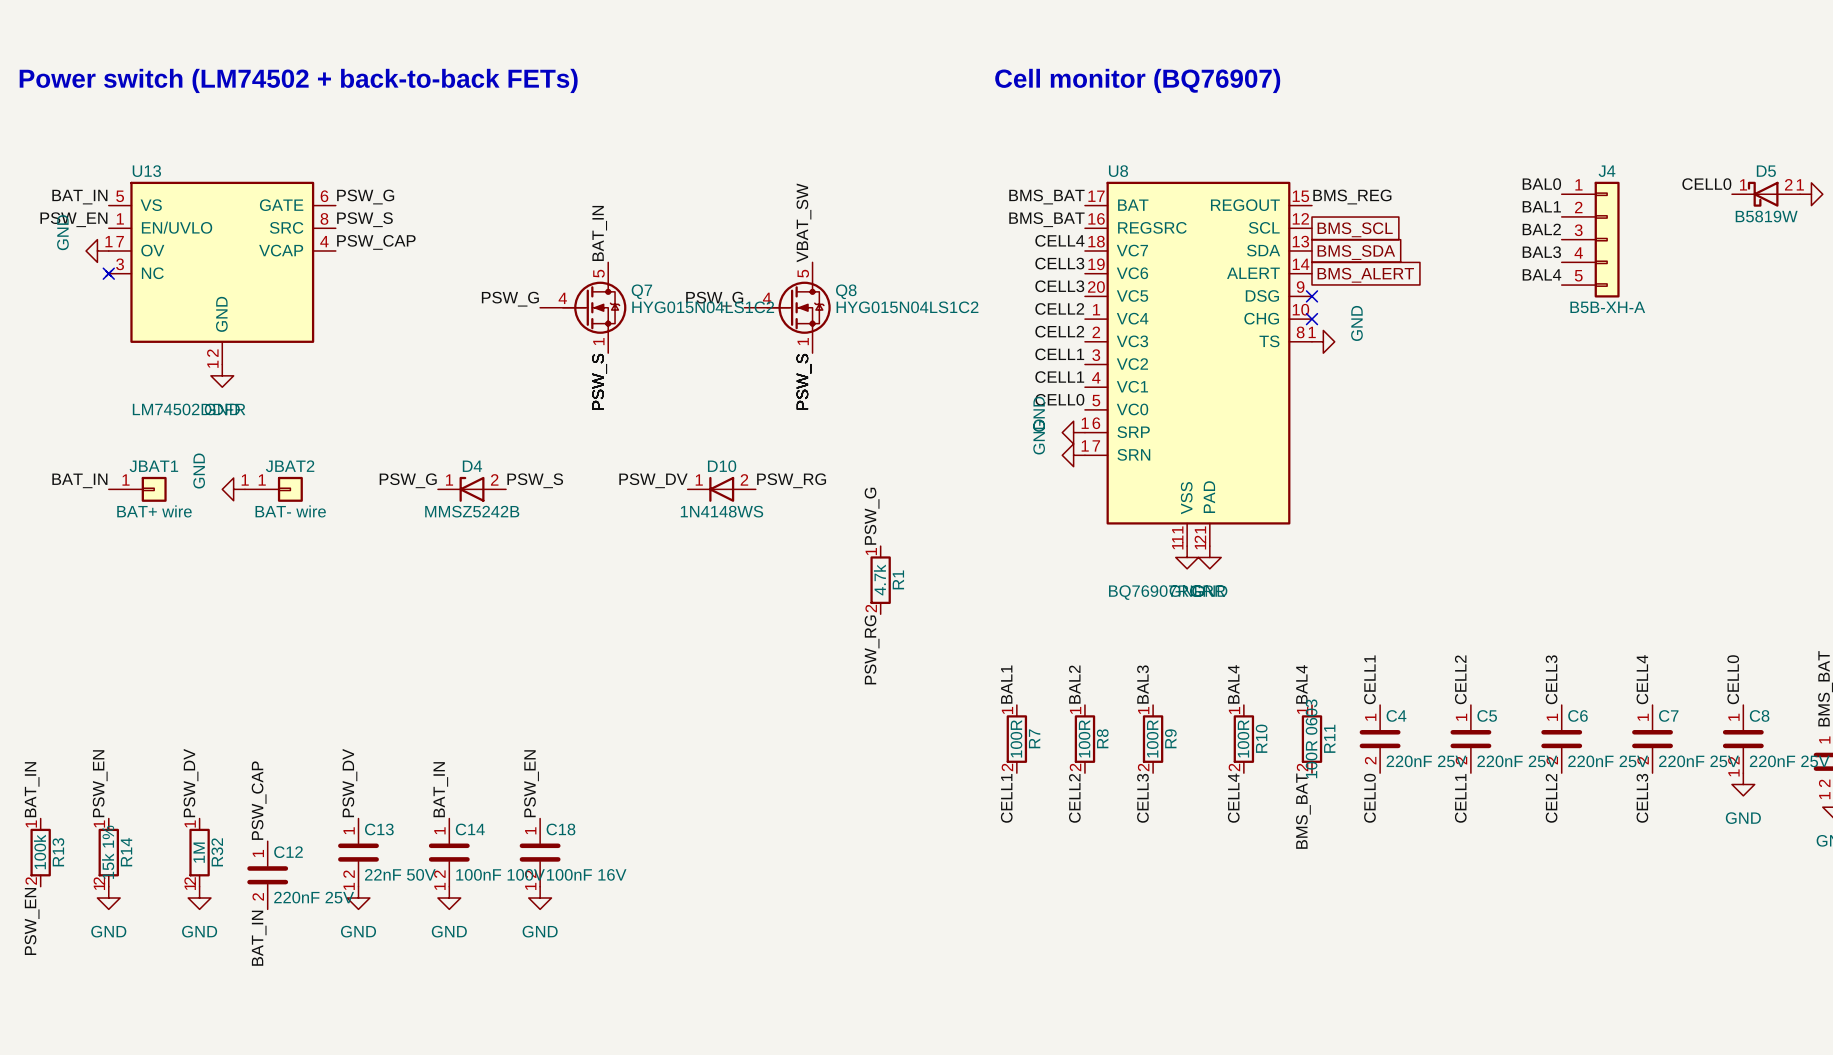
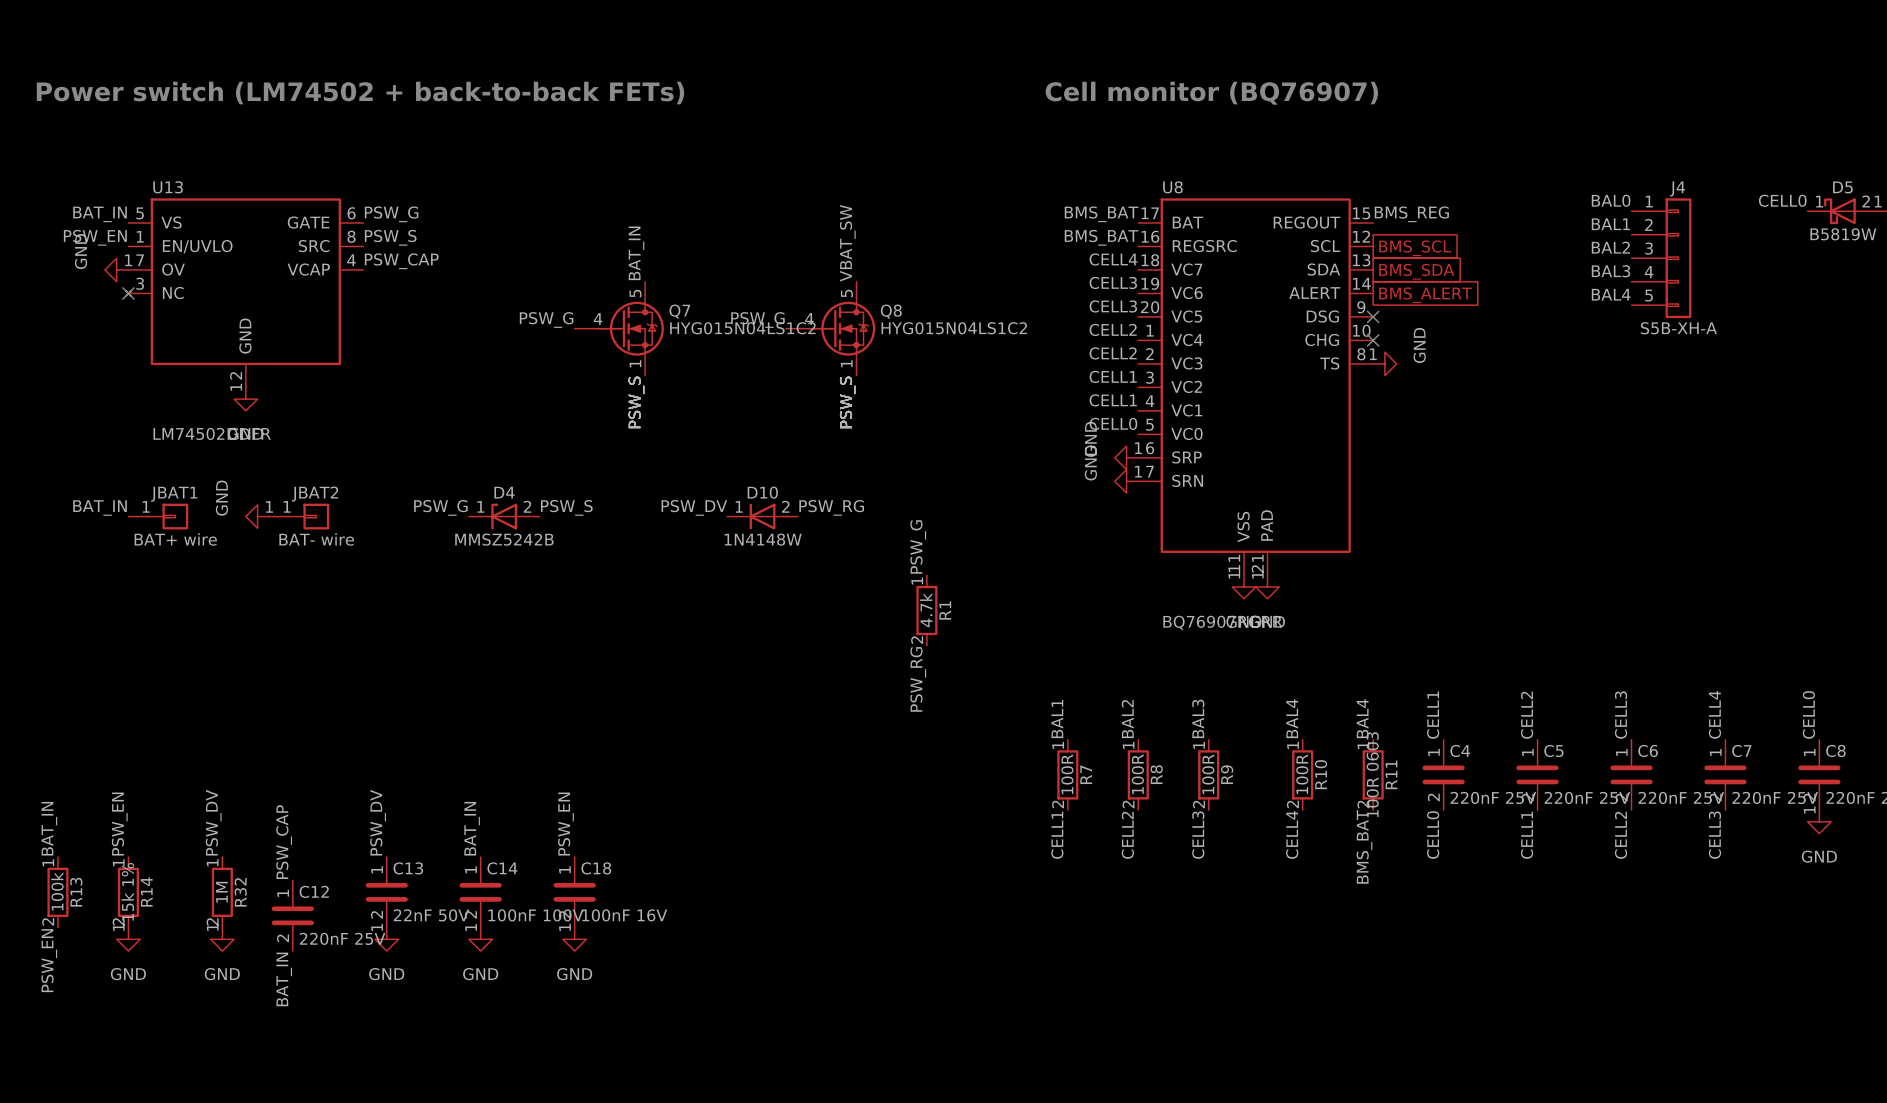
J4 value: B5B-XH-A (1607, 307) -> S5B-XH-A (1678, 328)
D10 value: 1N4148WS (721, 511) -> 1N4148W (763, 539)

